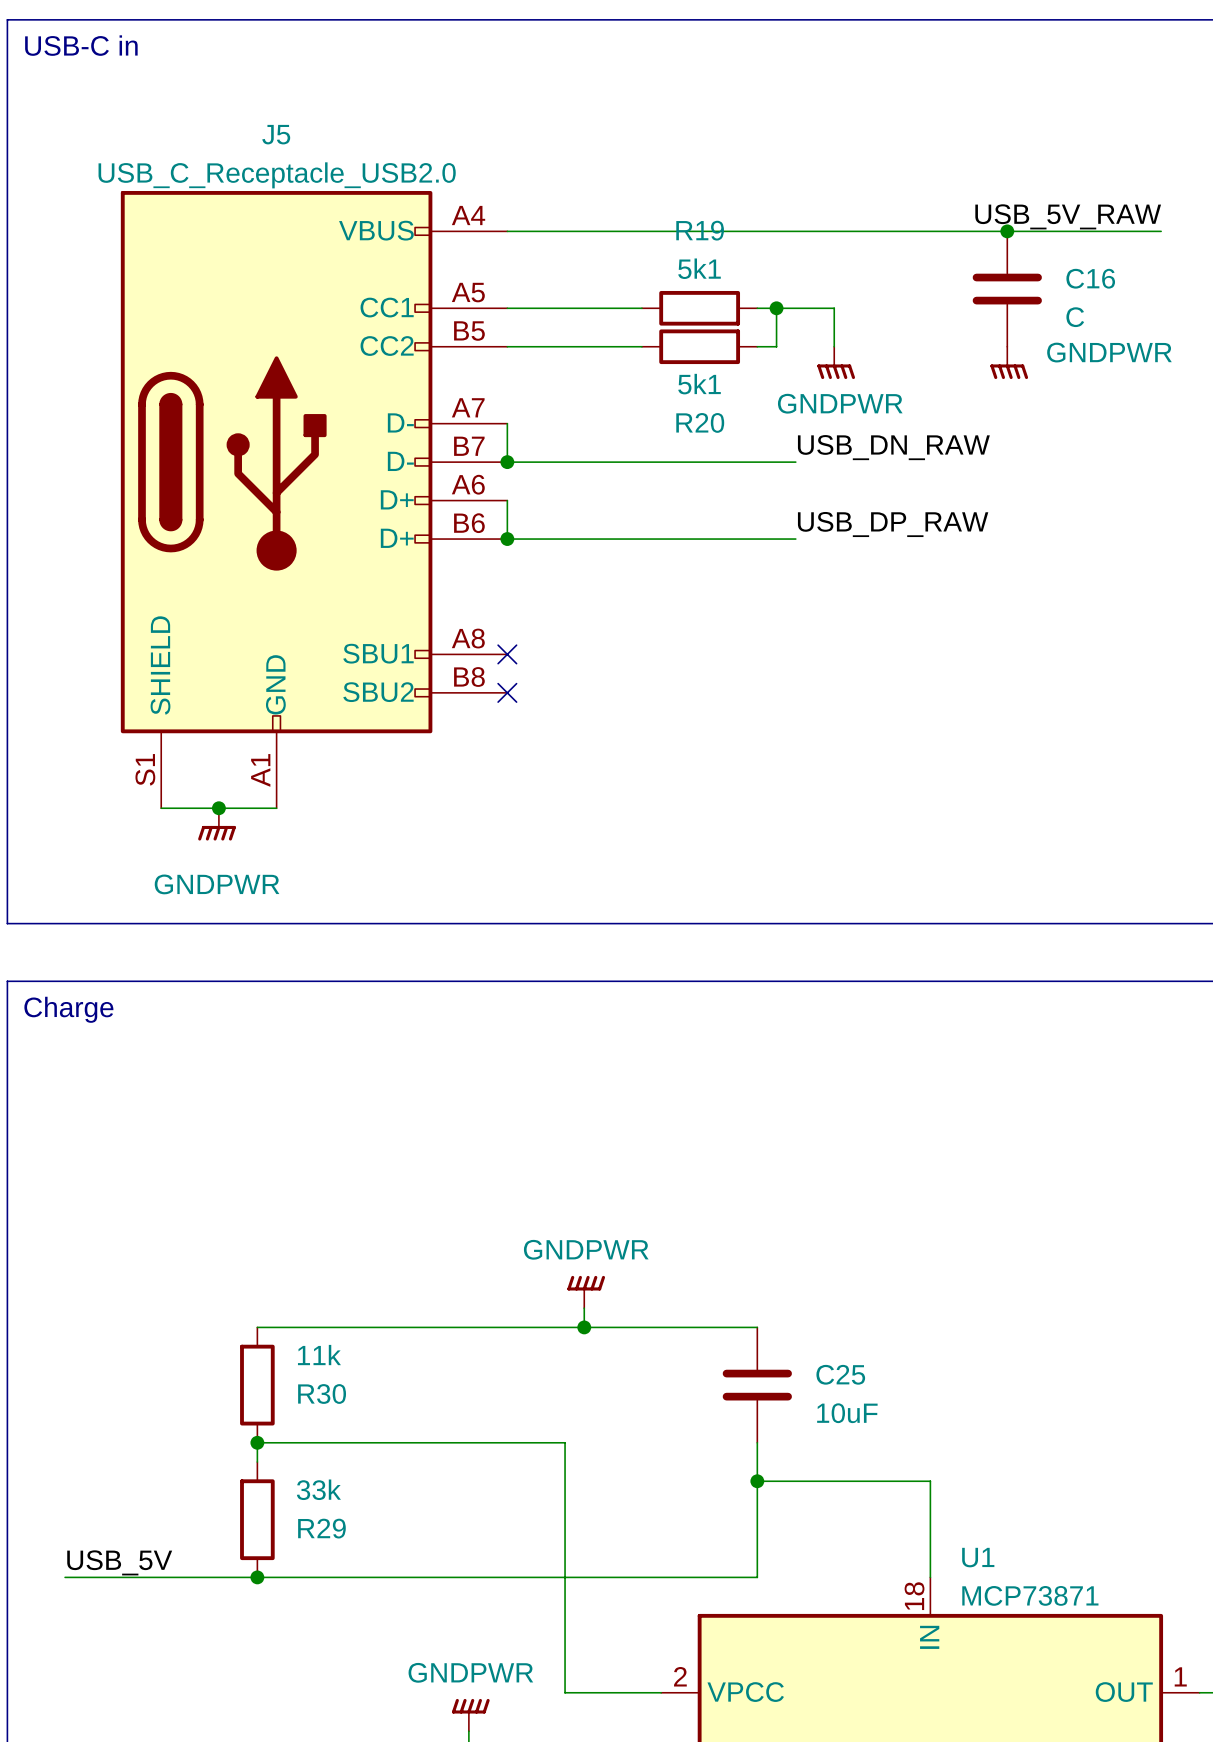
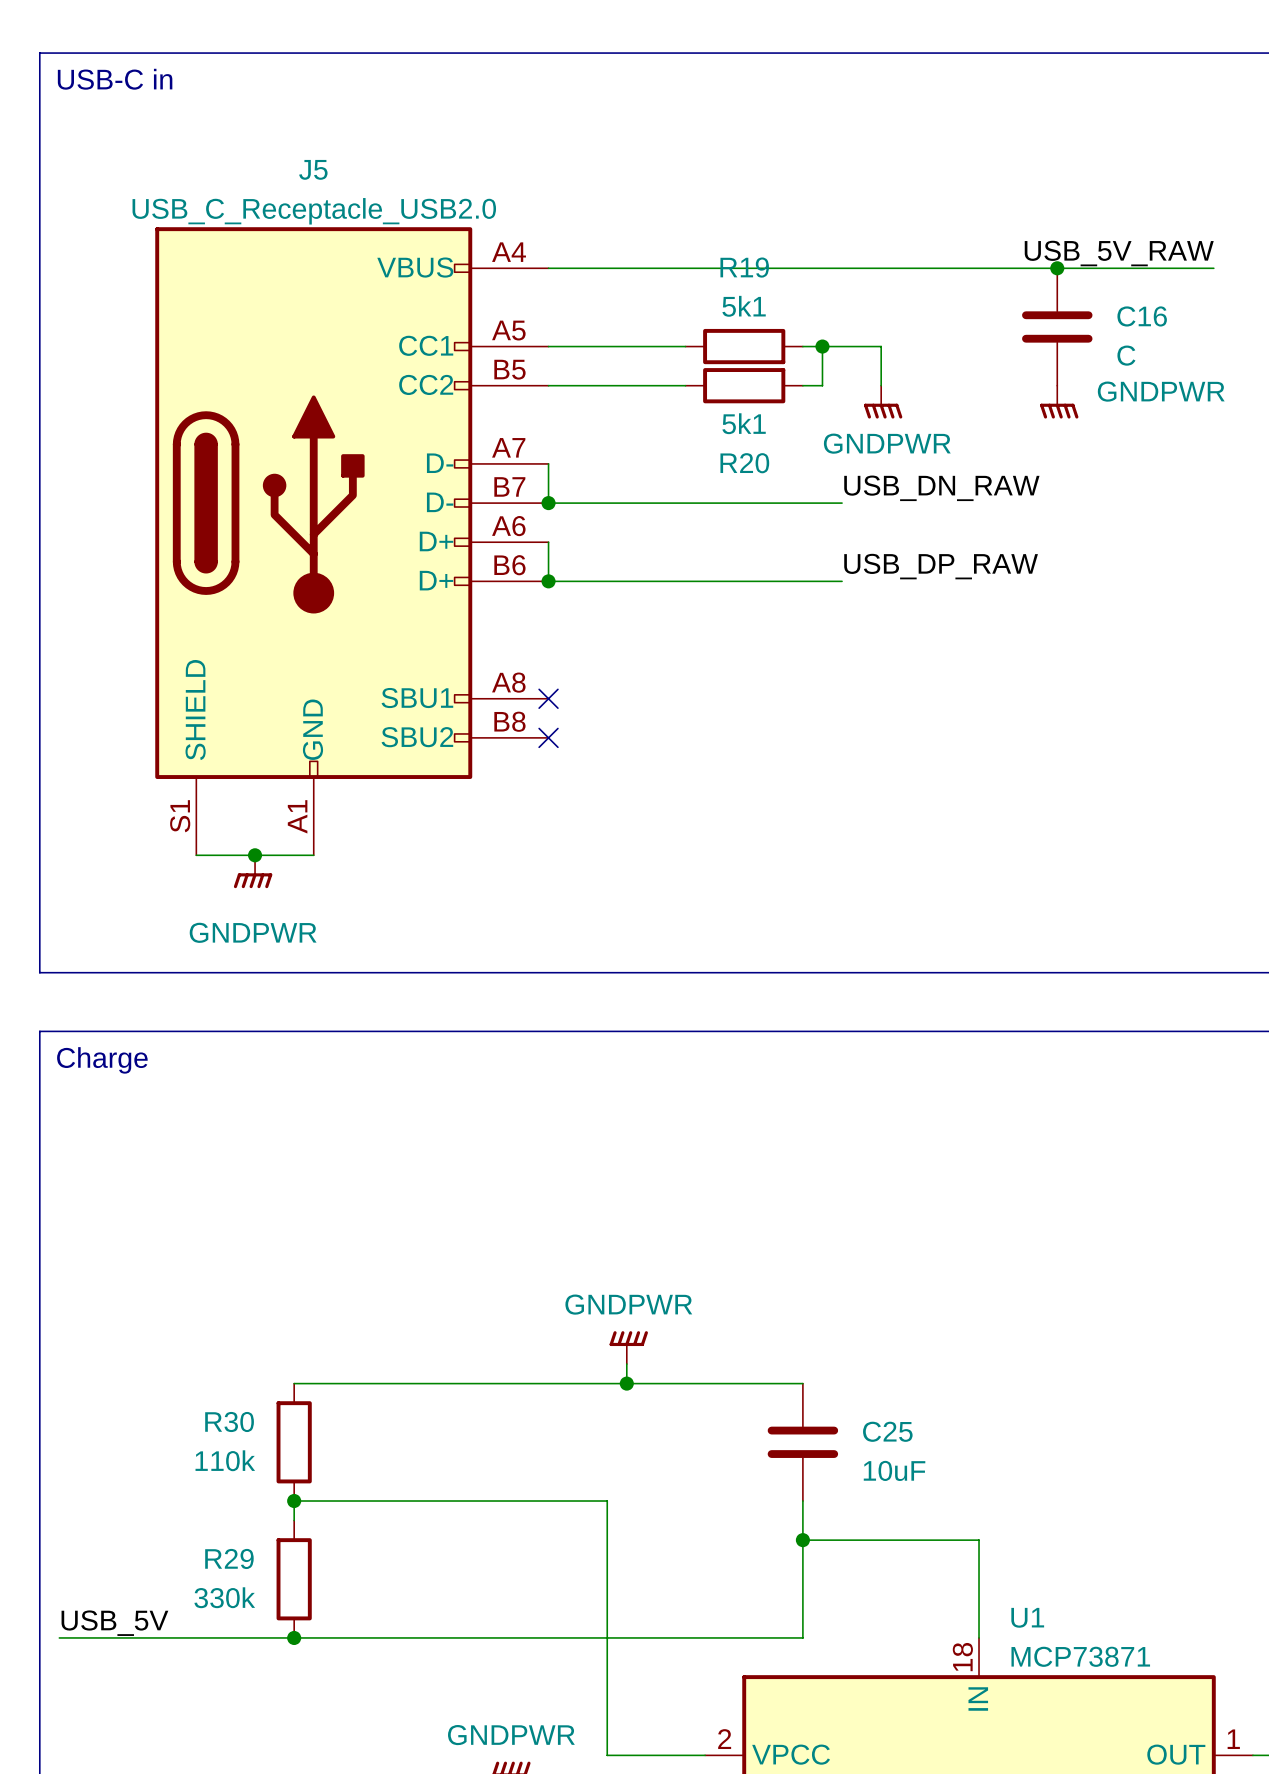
R30 value: 11k (319, 1355) -> 110k (225, 1460)
R30 name position: R30 (322, 1393) -> R30 (229, 1422)
R29 value: 33k (318, 1489) -> 330k (224, 1597)
R29 name position: R29 (321, 1528) -> R29 (229, 1558)
label position: USB_5V (119, 1562) -> USB_5V (114, 1623)
wire: none -> (59, 1637) (98, 1637)

